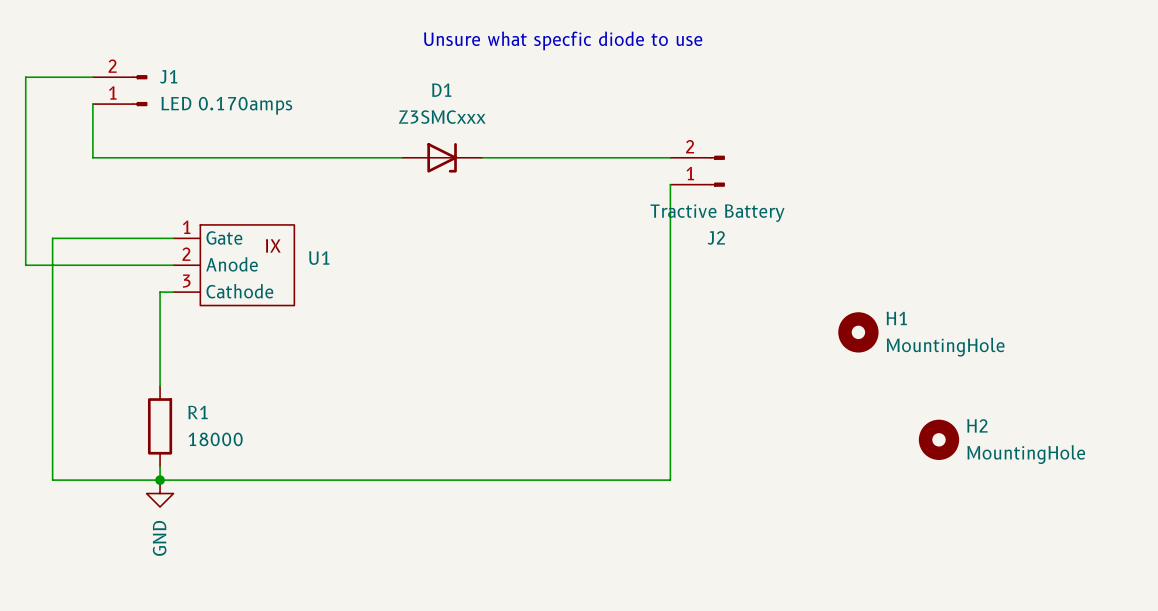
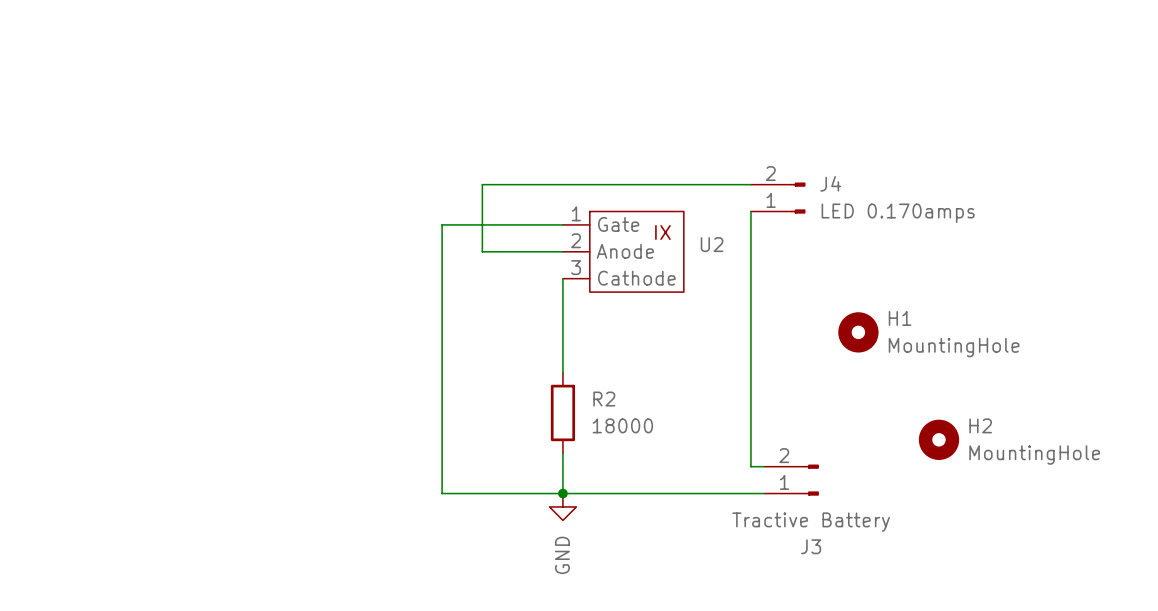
text: Unsure what specfic diode to use (563, 40) -> none
wire: (92, 77) (25, 77) (25, 265) (173, 265) -> none
J1: LED 0.170amps (120, 90) -> none
wire: (92, 104) (92, 157) (401, 157) -> none
D1: Z3SMCxxx (442, 157) -> none
wire: (482, 157) (670, 157) -> none
J2: Tractive Battery (697, 171) -> none
wire: (670, 184) (670, 480) (52, 480) (52, 238) (173, 238) -> none
wire: none -> (750, 184) (482, 184) (482, 251) (562, 251)
J4: none -> LED 0.170amps (778, 198)
wire: none -> (750, 211) (750, 466) (764, 466)
wire: none -> (562, 224) (442, 224) (442, 493) (764, 493)
U2: none -> (623, 258)
U1: (233, 271) -> none
wire: none -> (562, 278) (562, 372)
wire: (173, 292) (160, 292) (160, 386) -> none
R2: none -> 18000 (562, 412)
R1: 18000 (160, 426) -> none
wire: none -> (562, 453) (562, 493)
wire: (160, 466) (160, 480) -> none
junction: (160, 480) -> none
J3: none -> Tractive Battery (791, 480)
power symbol: GND (160, 493) -> none
junction: none -> (562, 493)
power symbol: none -> GND (562, 506)

